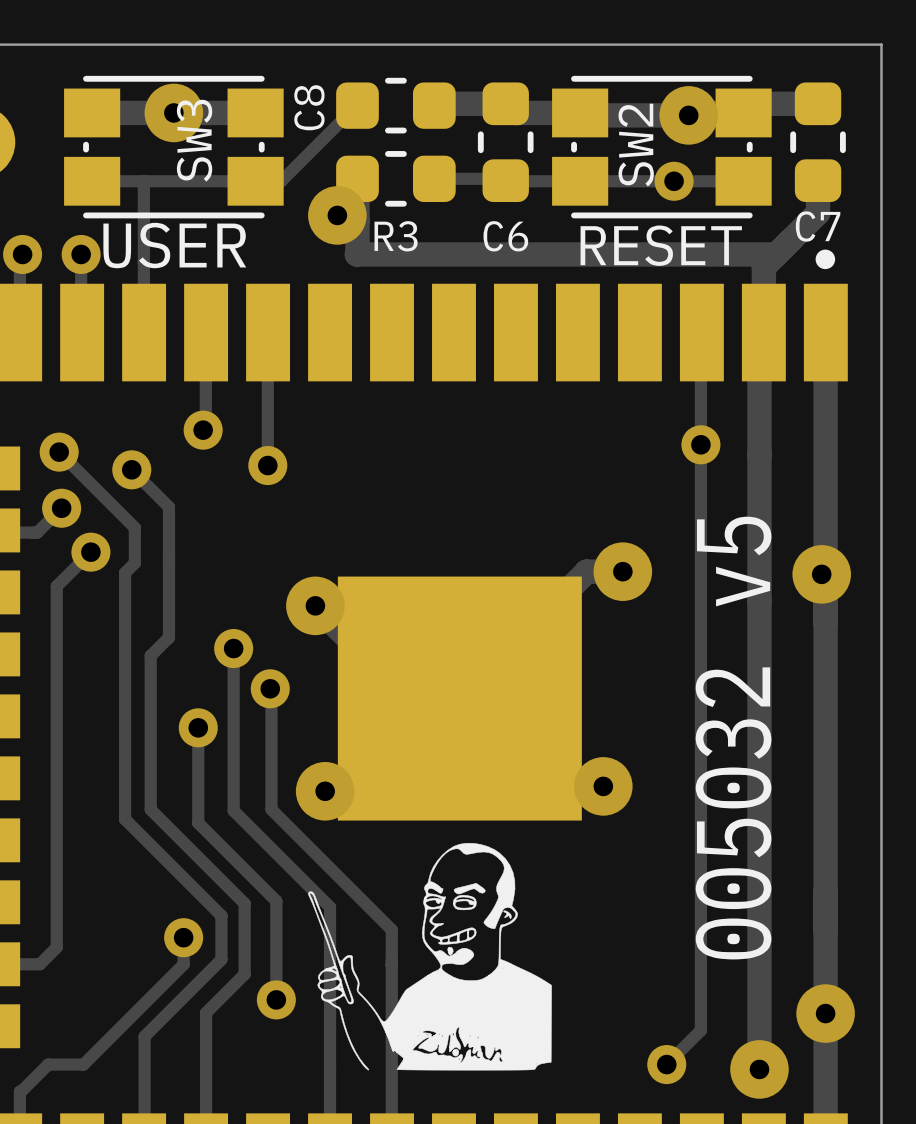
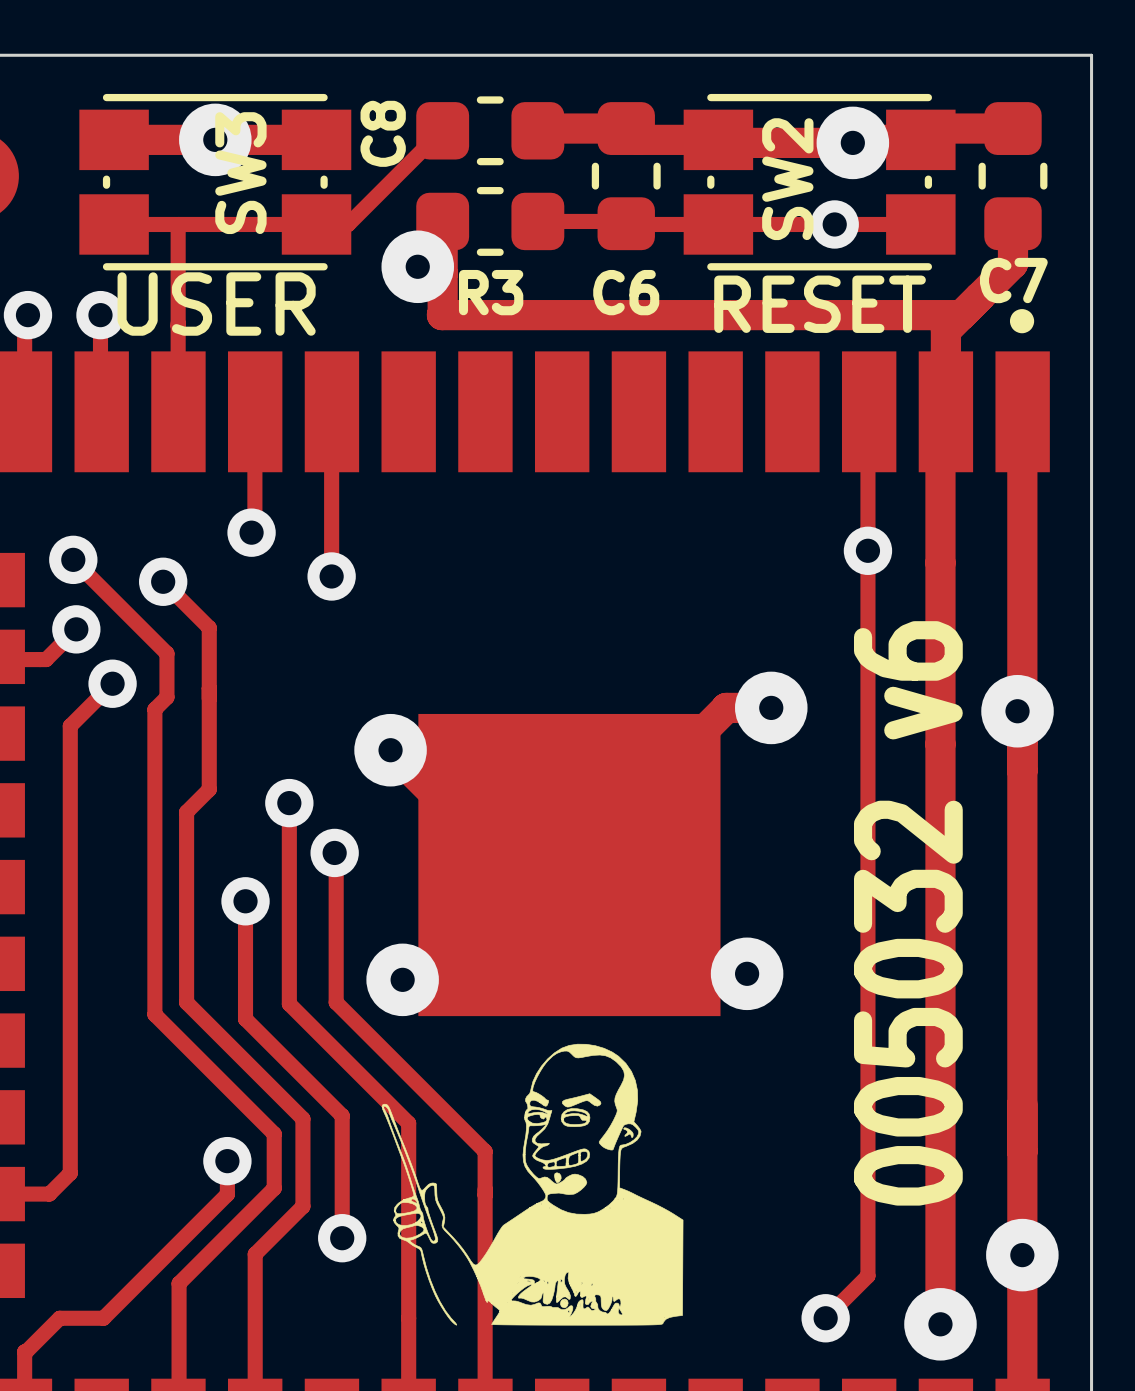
text: 005032 v5 (733, 738) -> 005032 v6 (908, 913)

